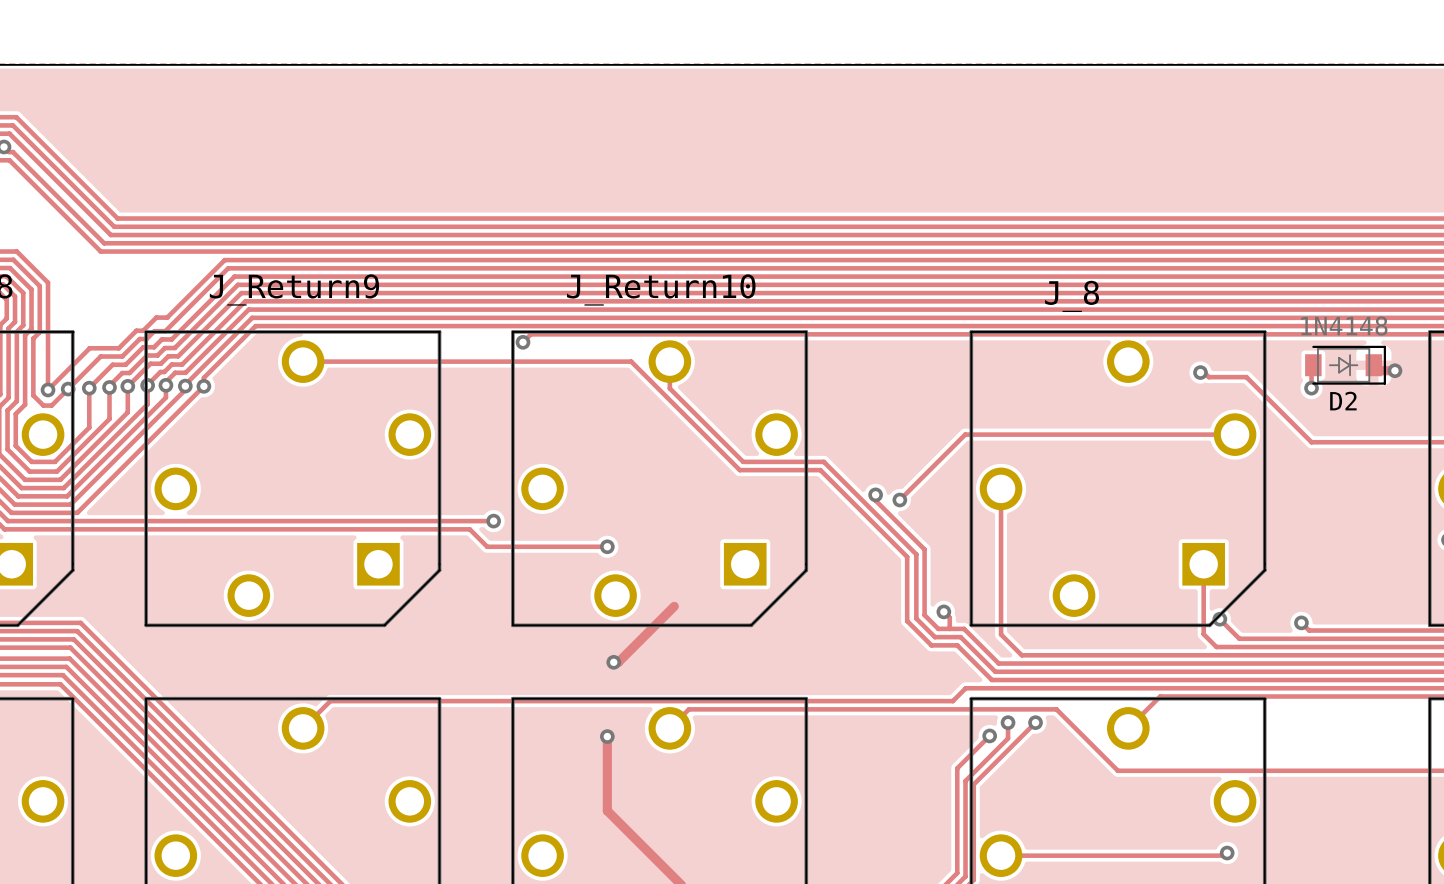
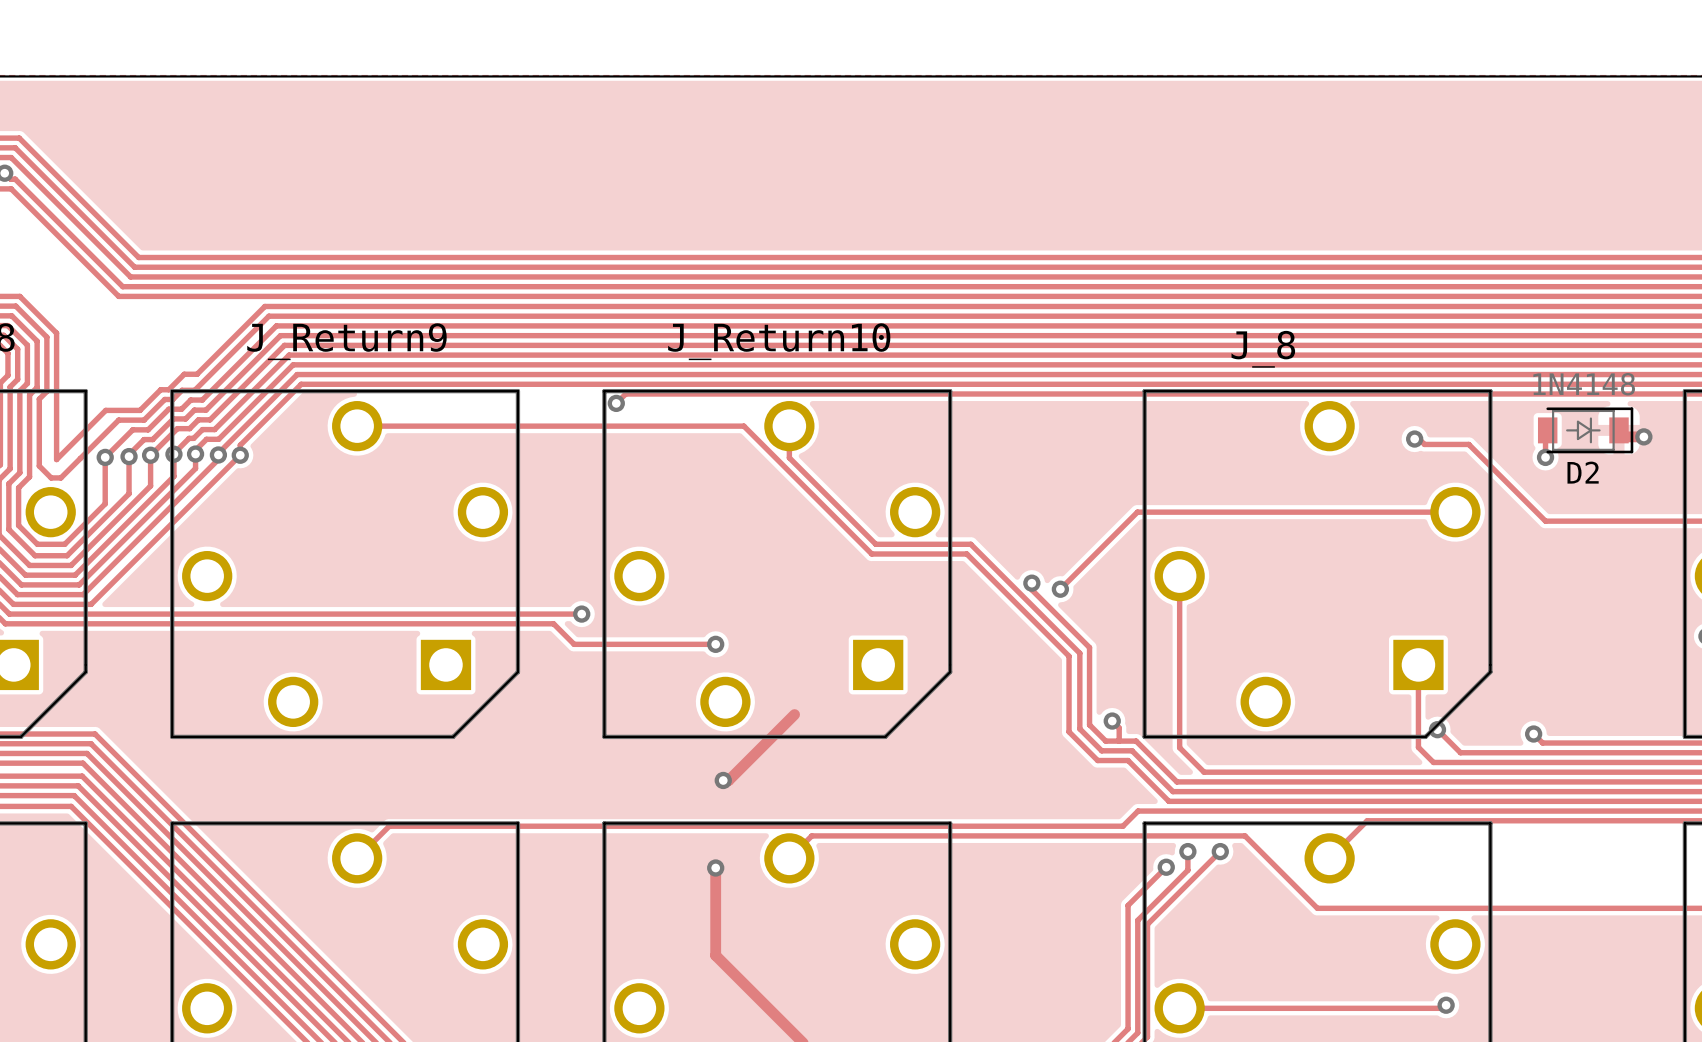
via: (48, 389) -> none
via: (68, 389) -> none

